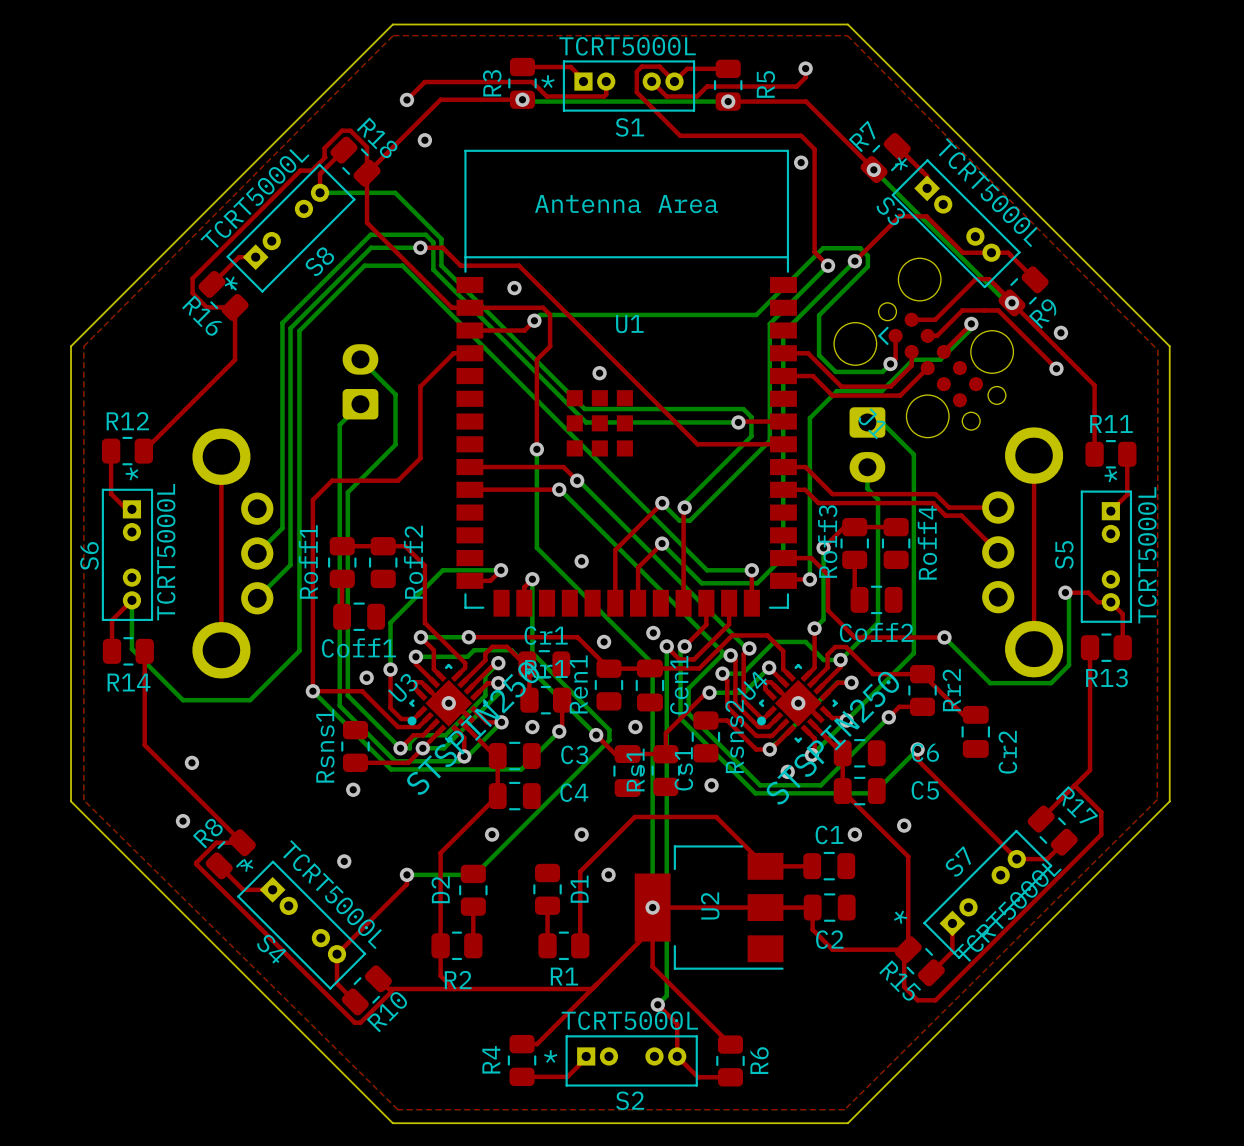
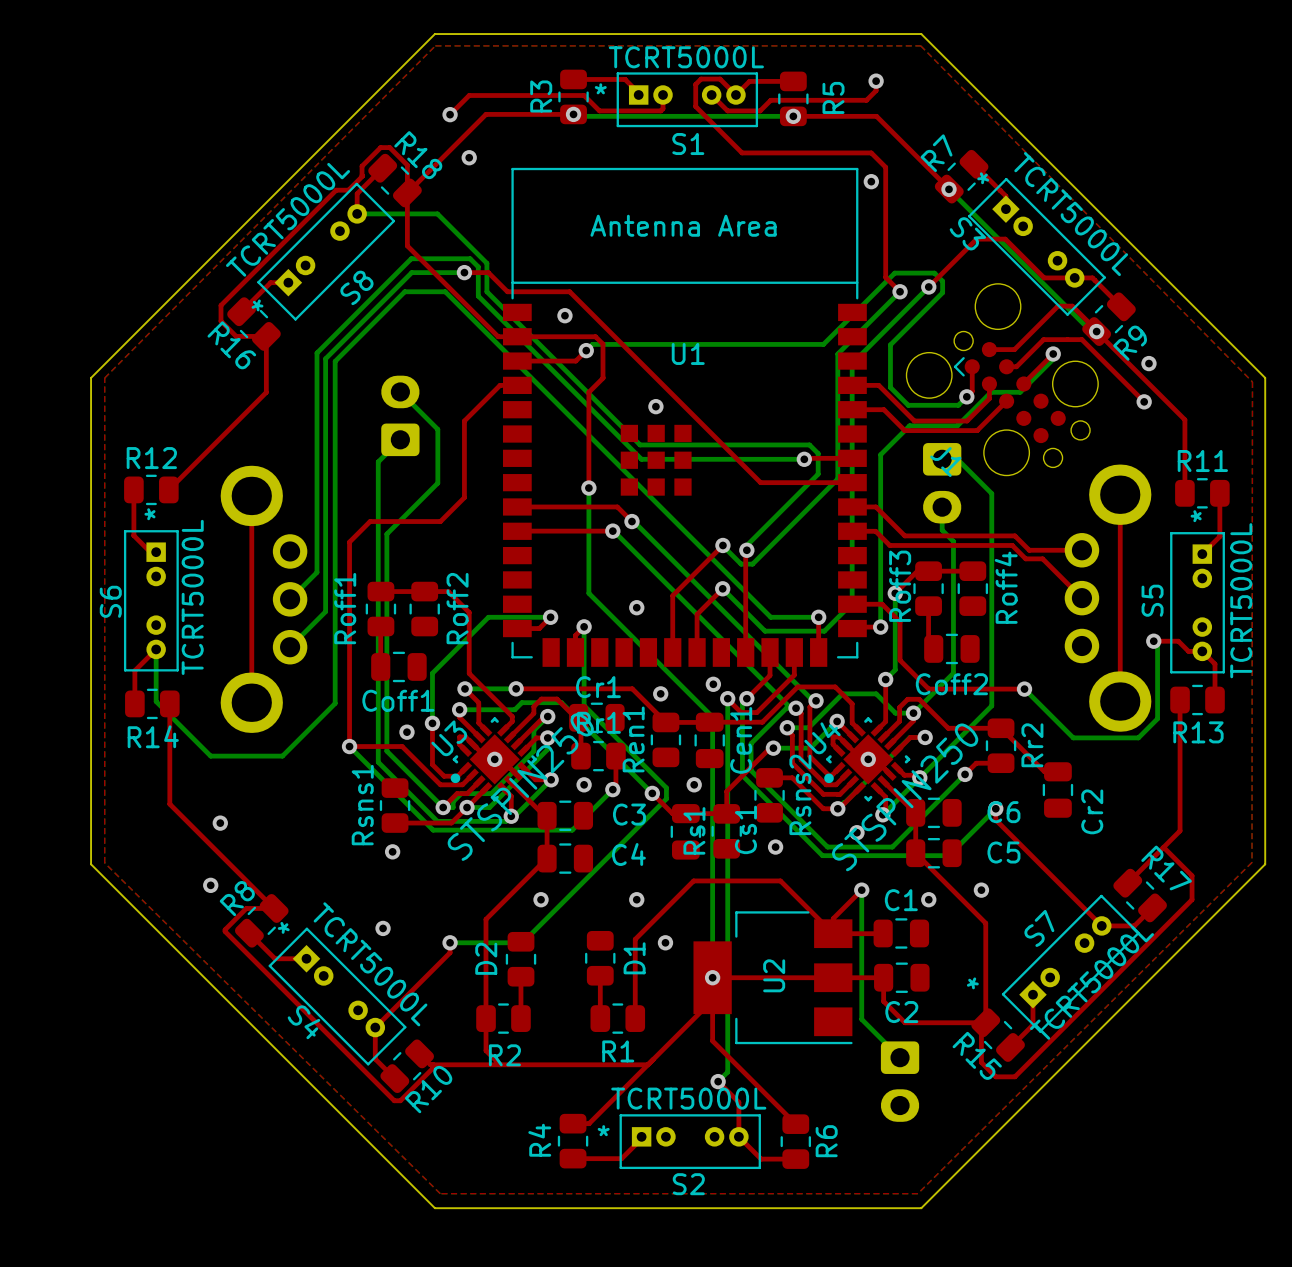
top track: none -> (861, 890) (833, 918) (833, 933)
bottom track: none -> (861, 890) (861, 1019) (900, 1057)
via: none -> (861, 890)
part: none -> (900, 1081)

